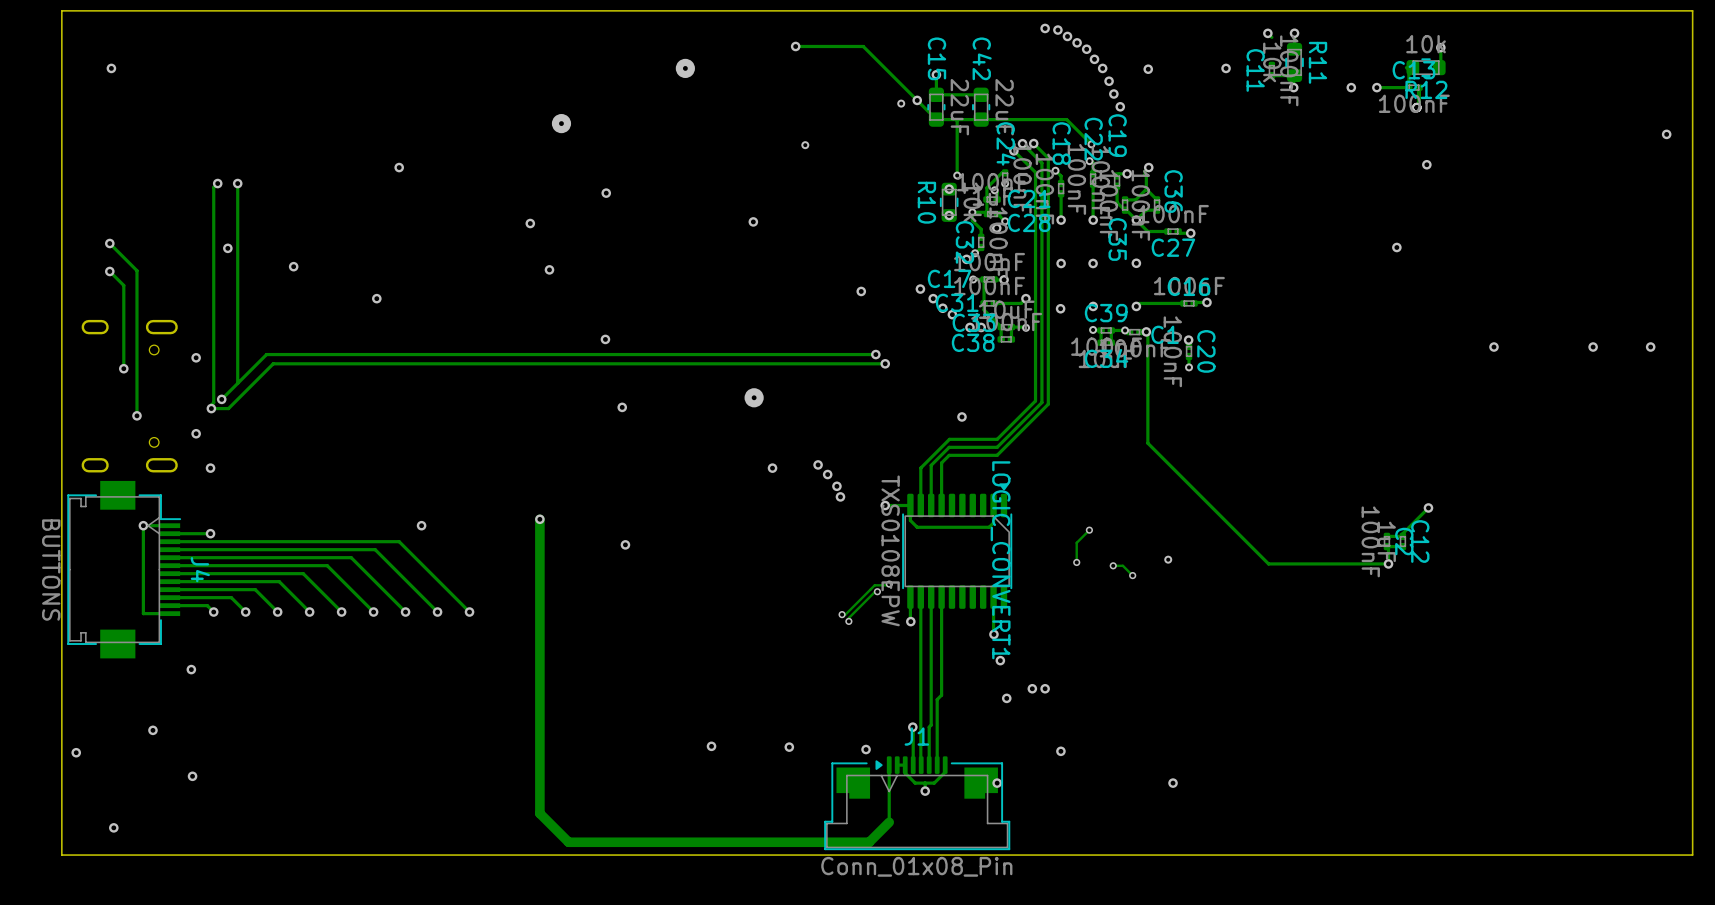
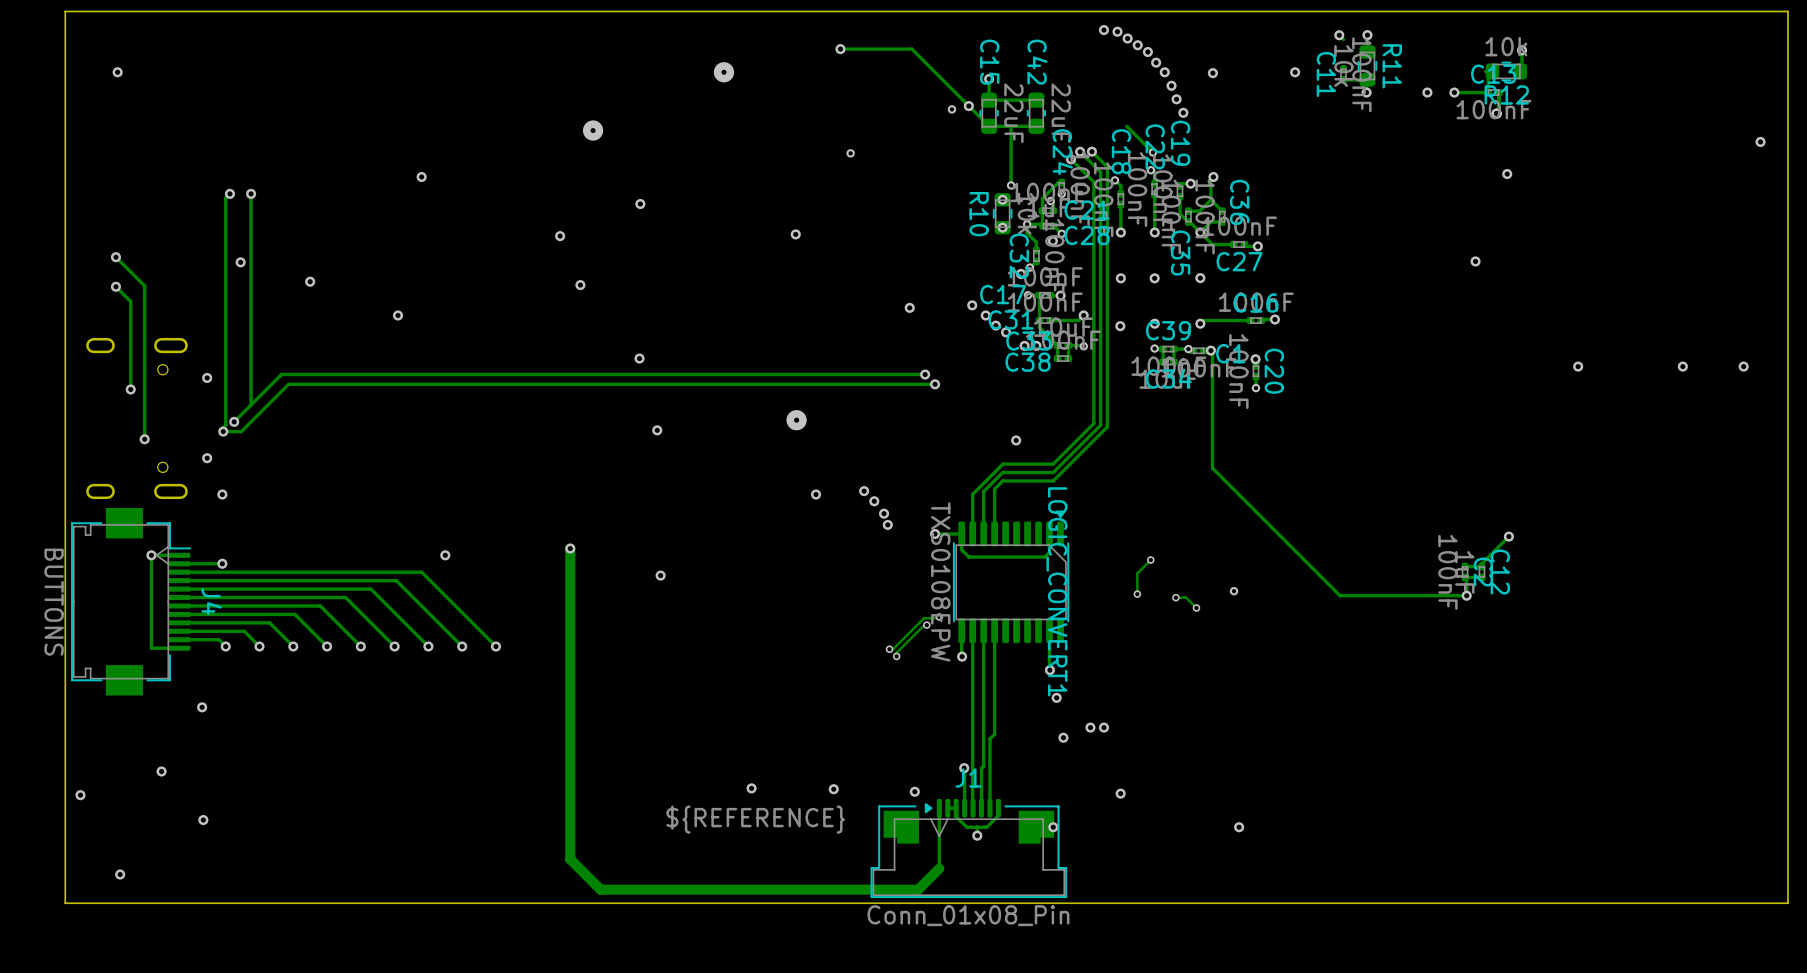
track: (1066, 119) (981, 119) -> none
text: none -> ${REFERENCE} (755, 819)

